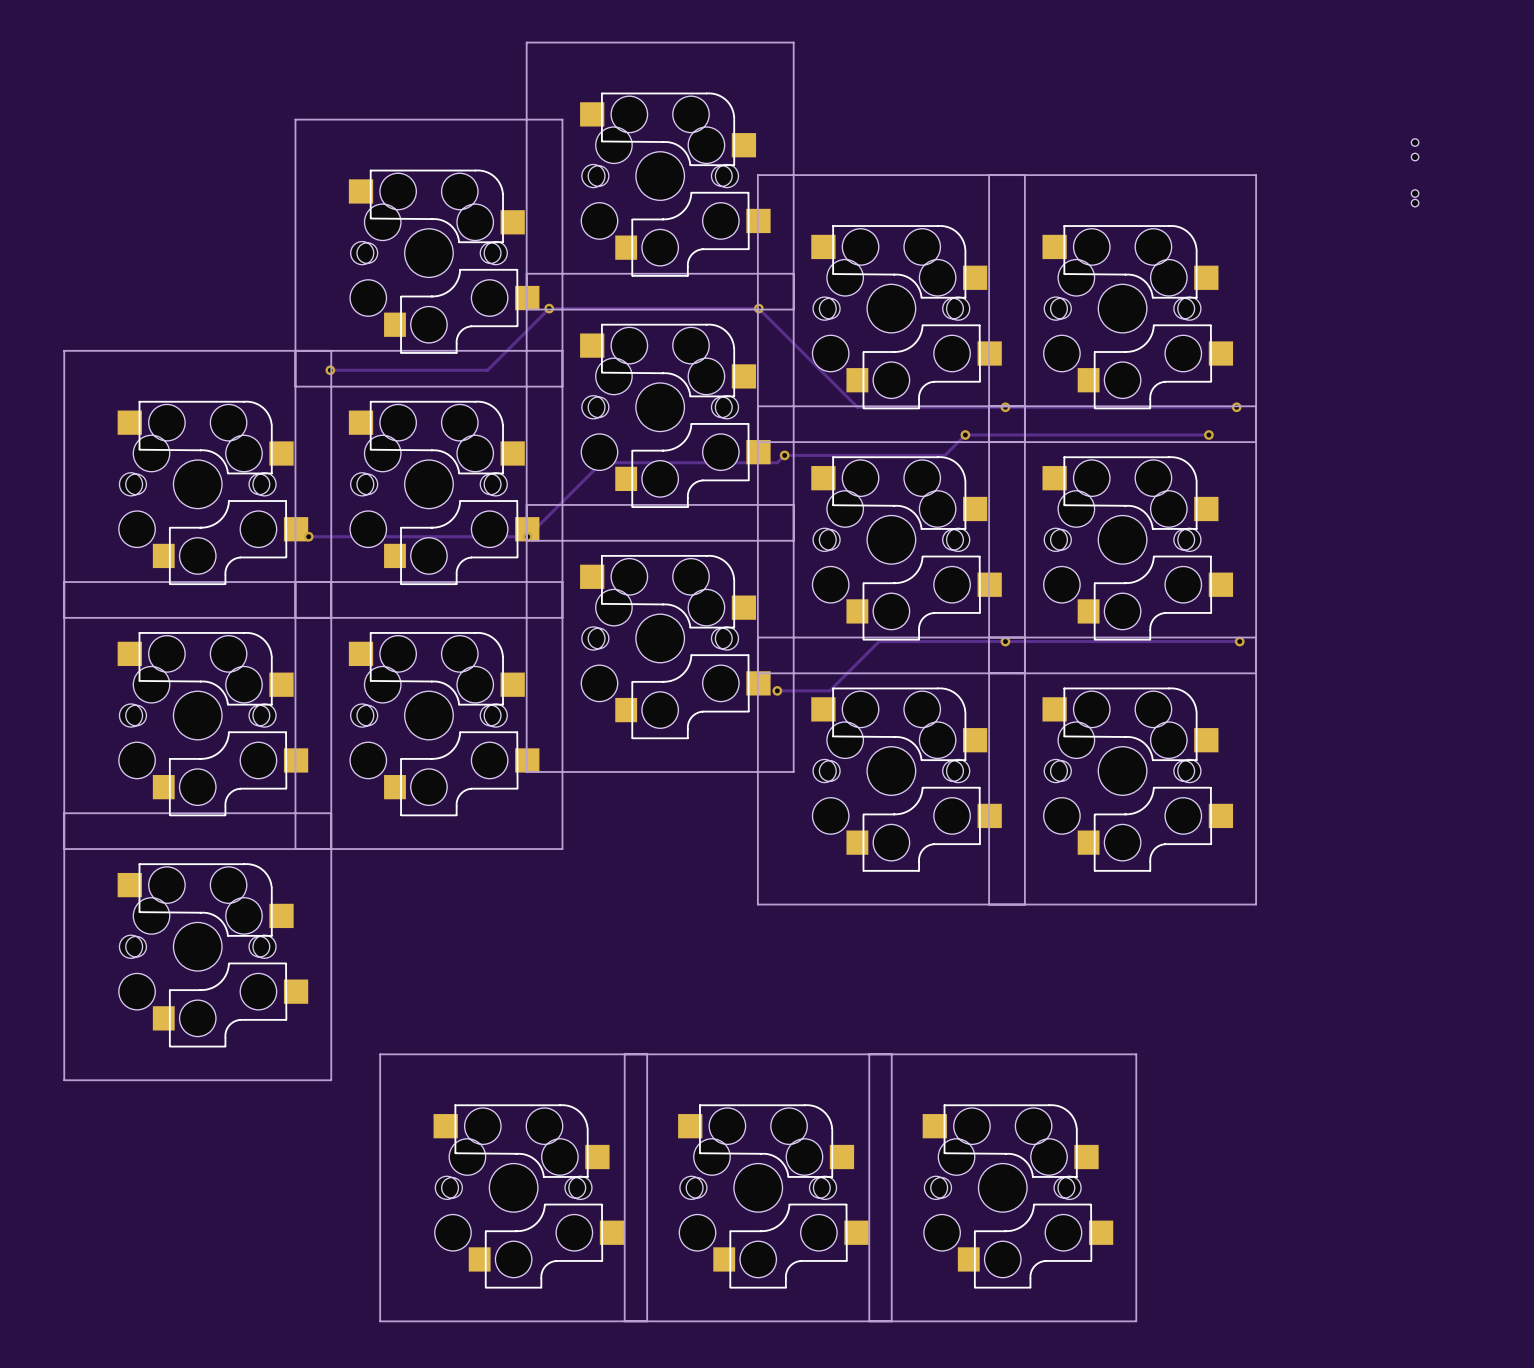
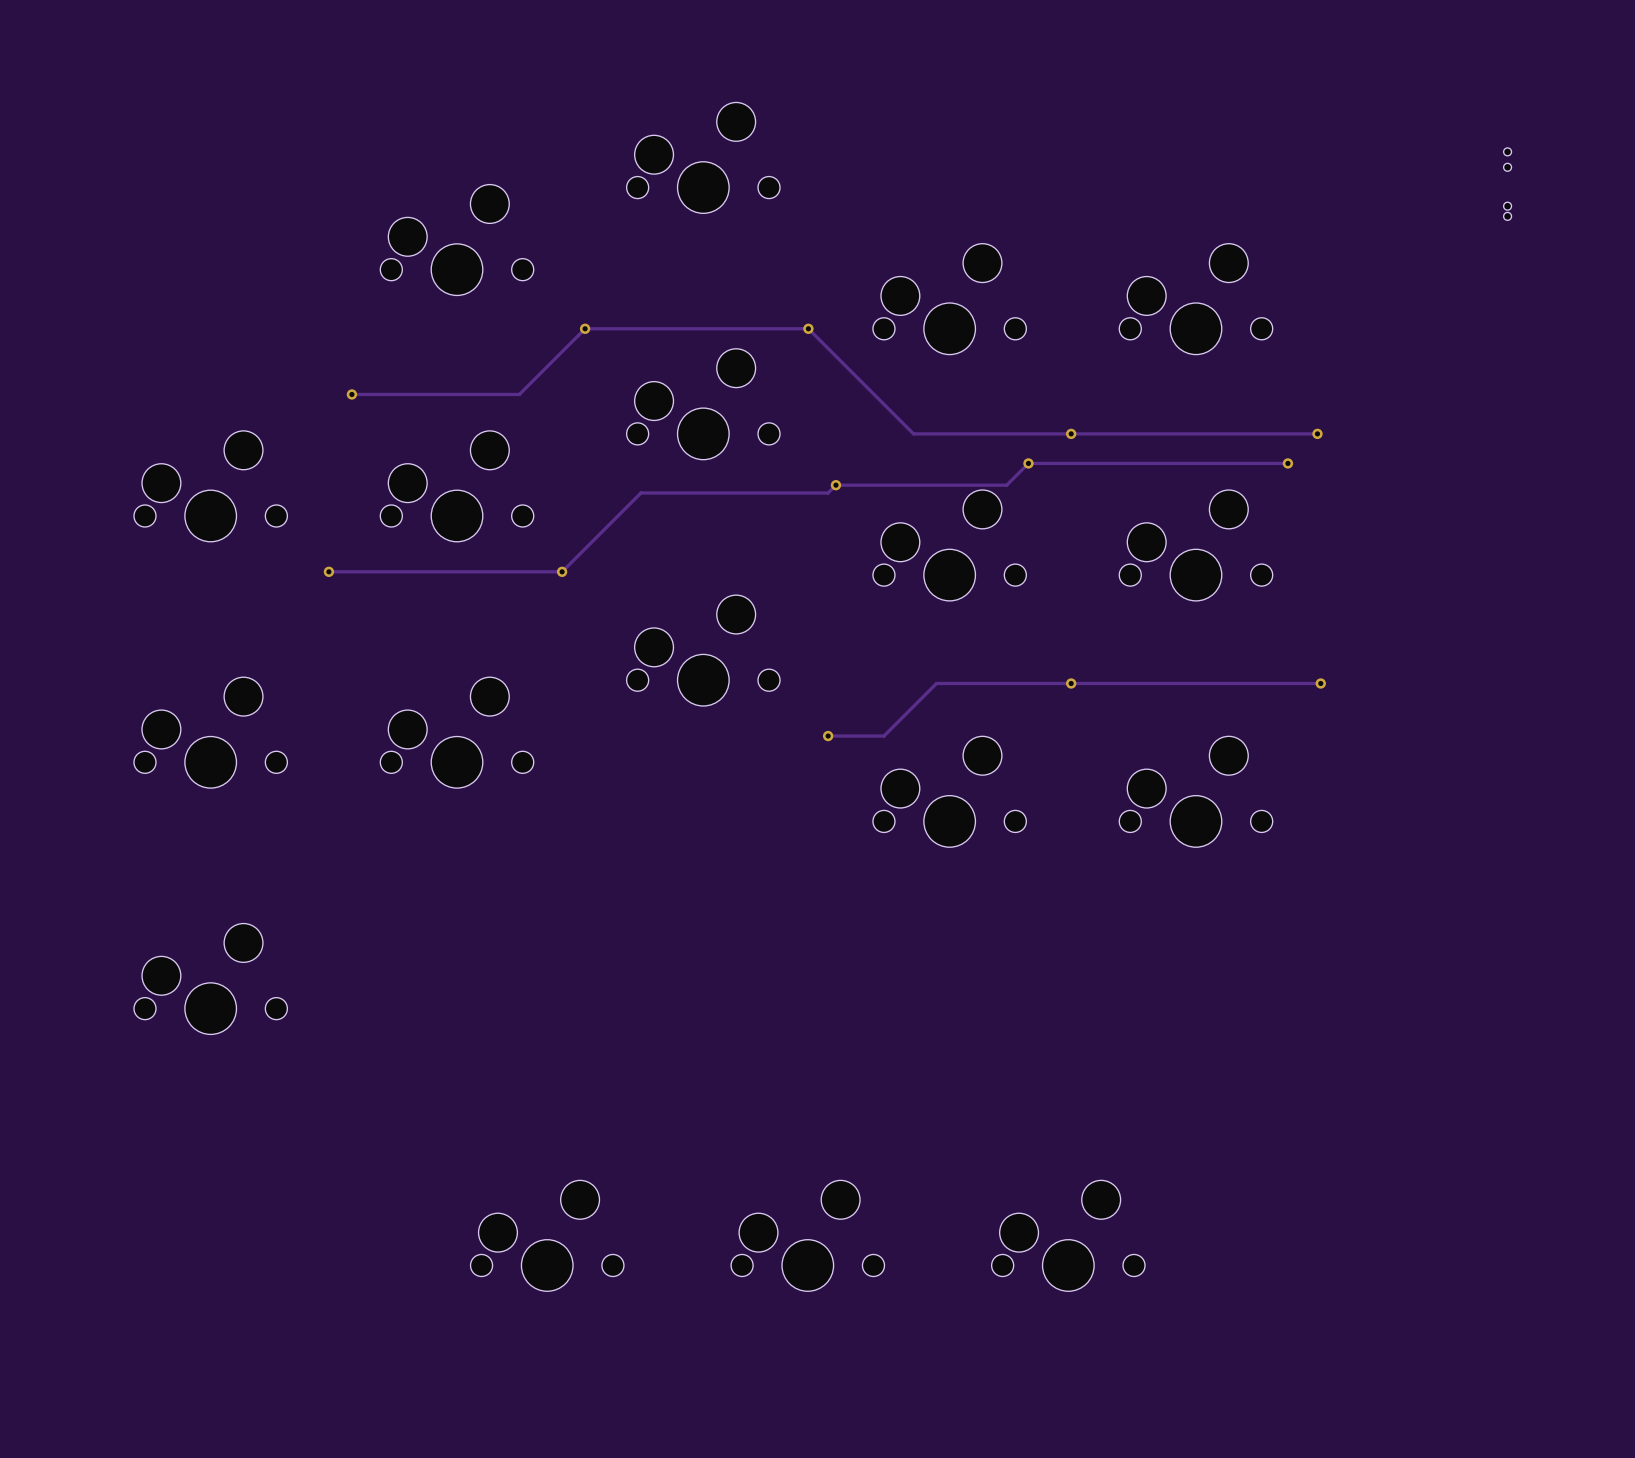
part: none -> (703, 157)
part: (660, 176) -> none
part: none -> (457, 240)
part: (428, 253) -> none
part: none -> (949, 299)
part: none -> (1195, 299)
part: (891, 308) -> none
part: (1122, 308) -> none
part: none -> (703, 404)
part: (660, 407) -> none
part: none -> (210, 486)
part: none -> (457, 486)
part: (197, 484) -> none
part: (428, 484) -> none
part: none -> (949, 545)
part: none -> (1195, 545)
part: (891, 539) -> none
part: (1122, 539) -> none
part: none -> (703, 650)
part: (660, 638) -> none
part: none -> (210, 732)
part: none -> (457, 732)
part: (197, 715) -> none
part: (428, 715) -> none
part: none -> (949, 791)
part: none -> (1195, 791)
part: (891, 771) -> none
part: (1122, 771) -> none
part: none -> (210, 978)
part: (197, 946) -> none
part: none -> (547, 1235)
part: none -> (807, 1235)
part: none -> (1068, 1235)
part: (513, 1187) -> none
part: (758, 1187) -> none
part: (1002, 1187) -> none

